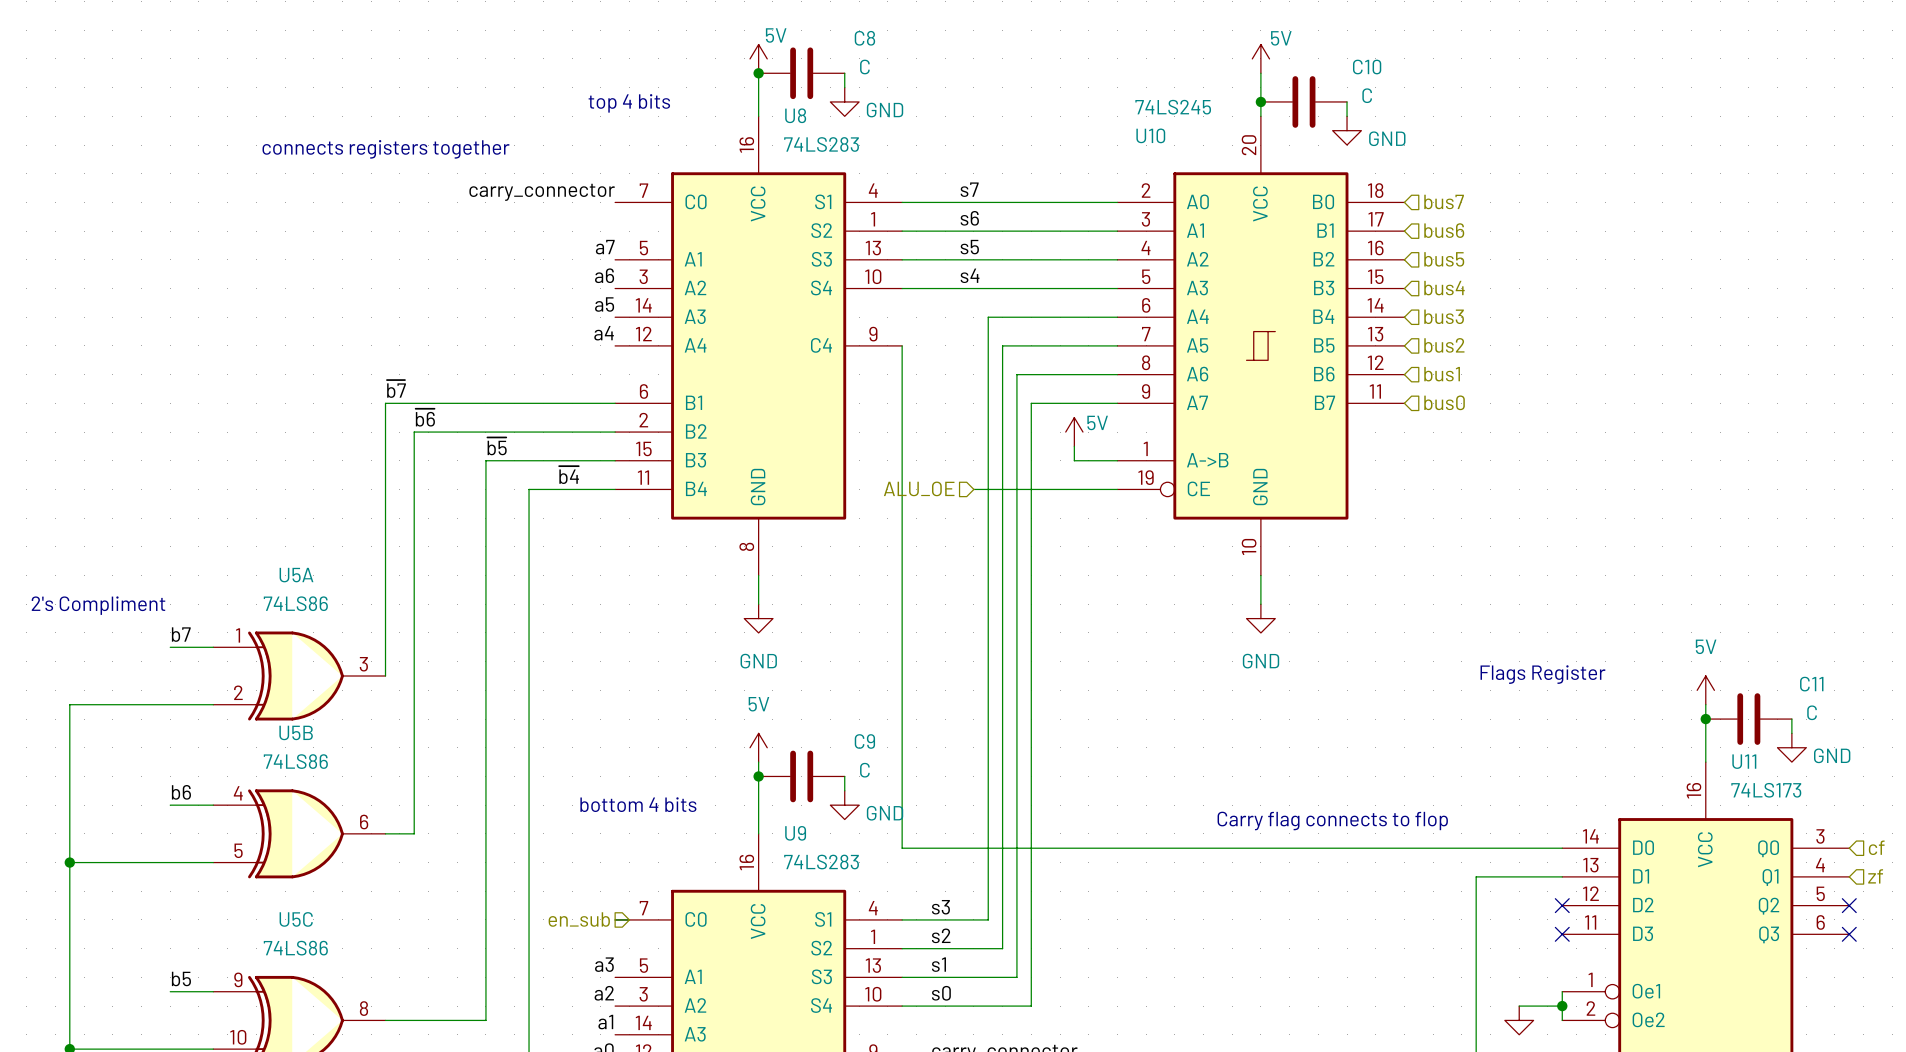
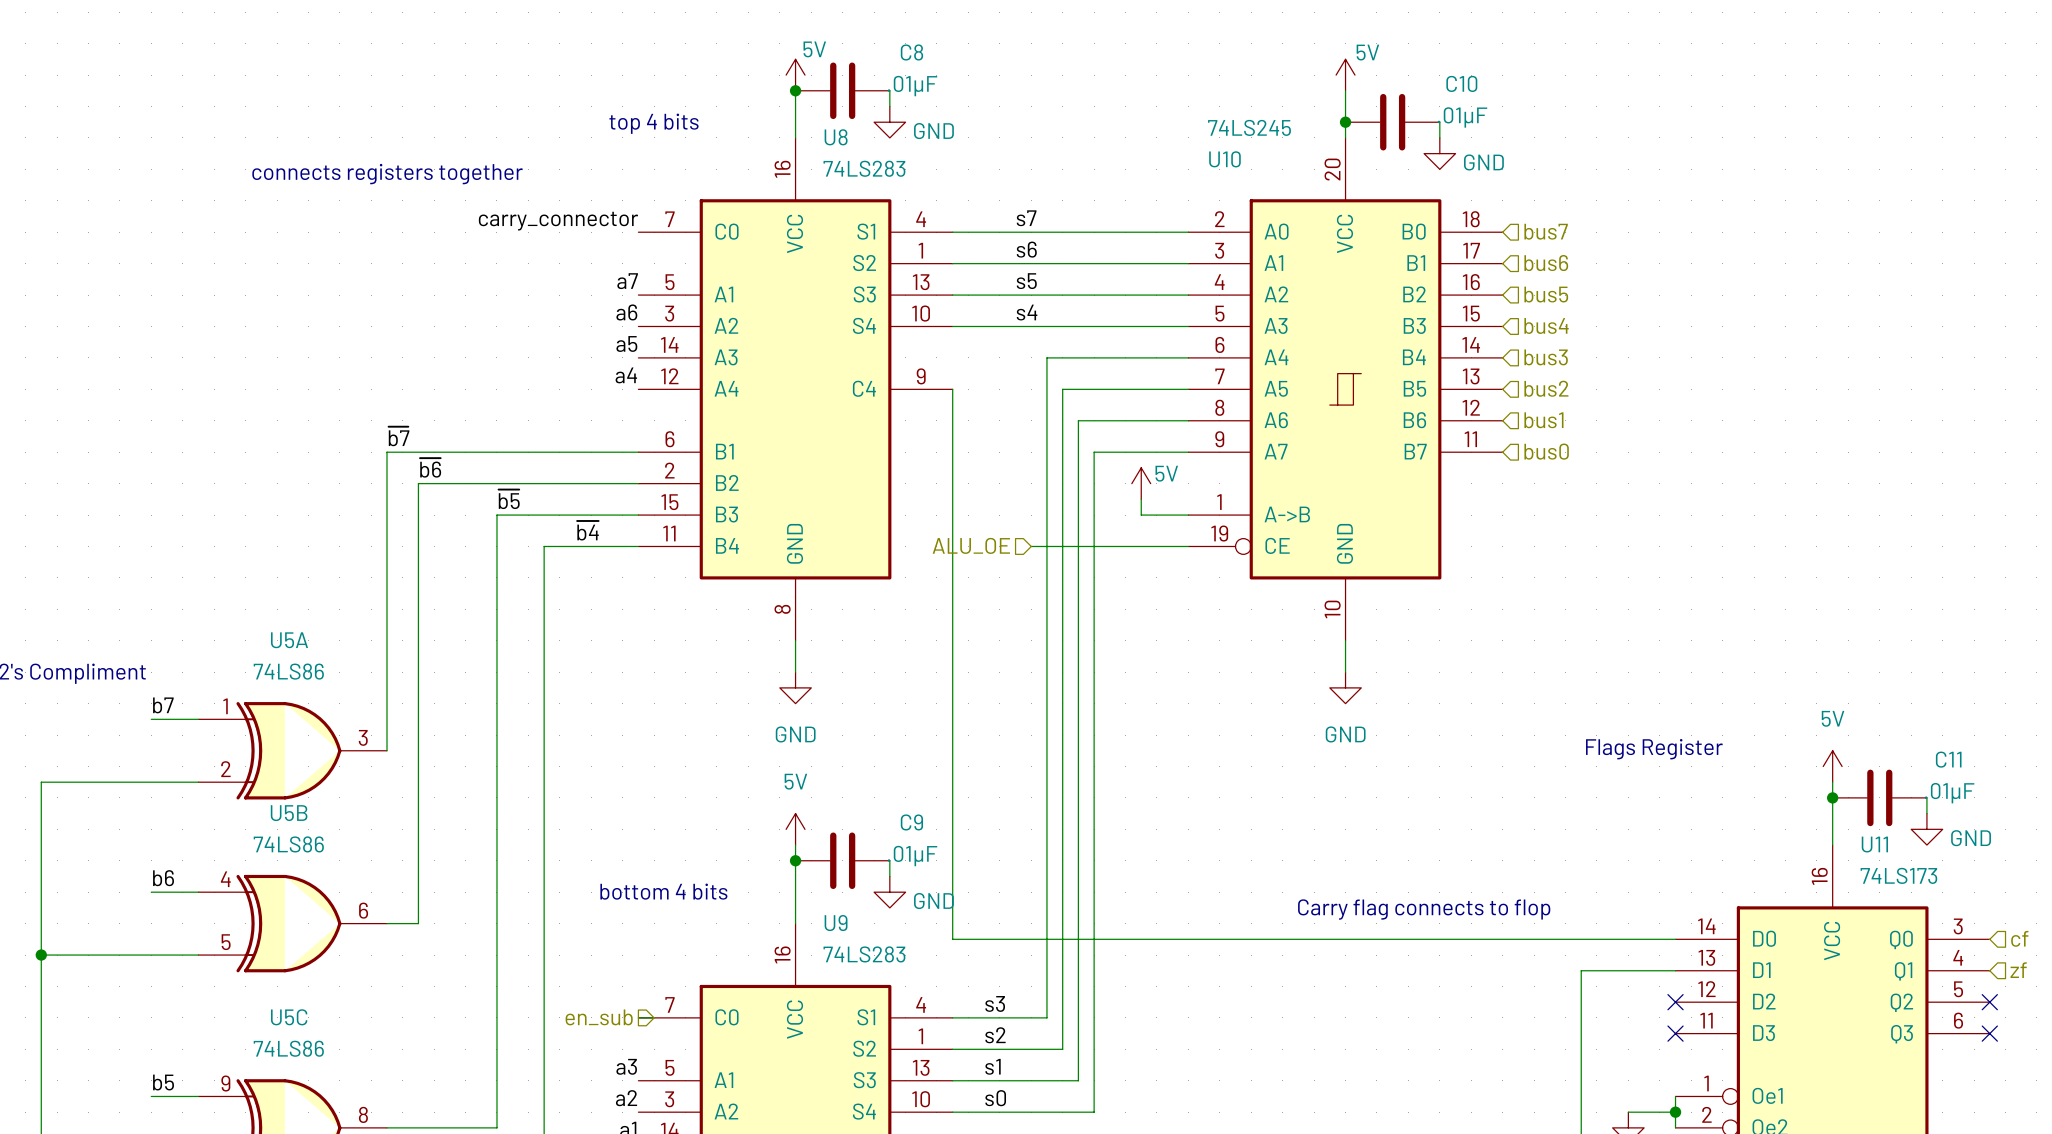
C8 value: C (864, 67) -> .01µF (912, 86)
C10 value: C (1367, 95) -> .01µF (1462, 117)
C11 value: C (1812, 712) -> .01µF (1949, 793)
C9 value: C (864, 770) -> .01µF (912, 856)

